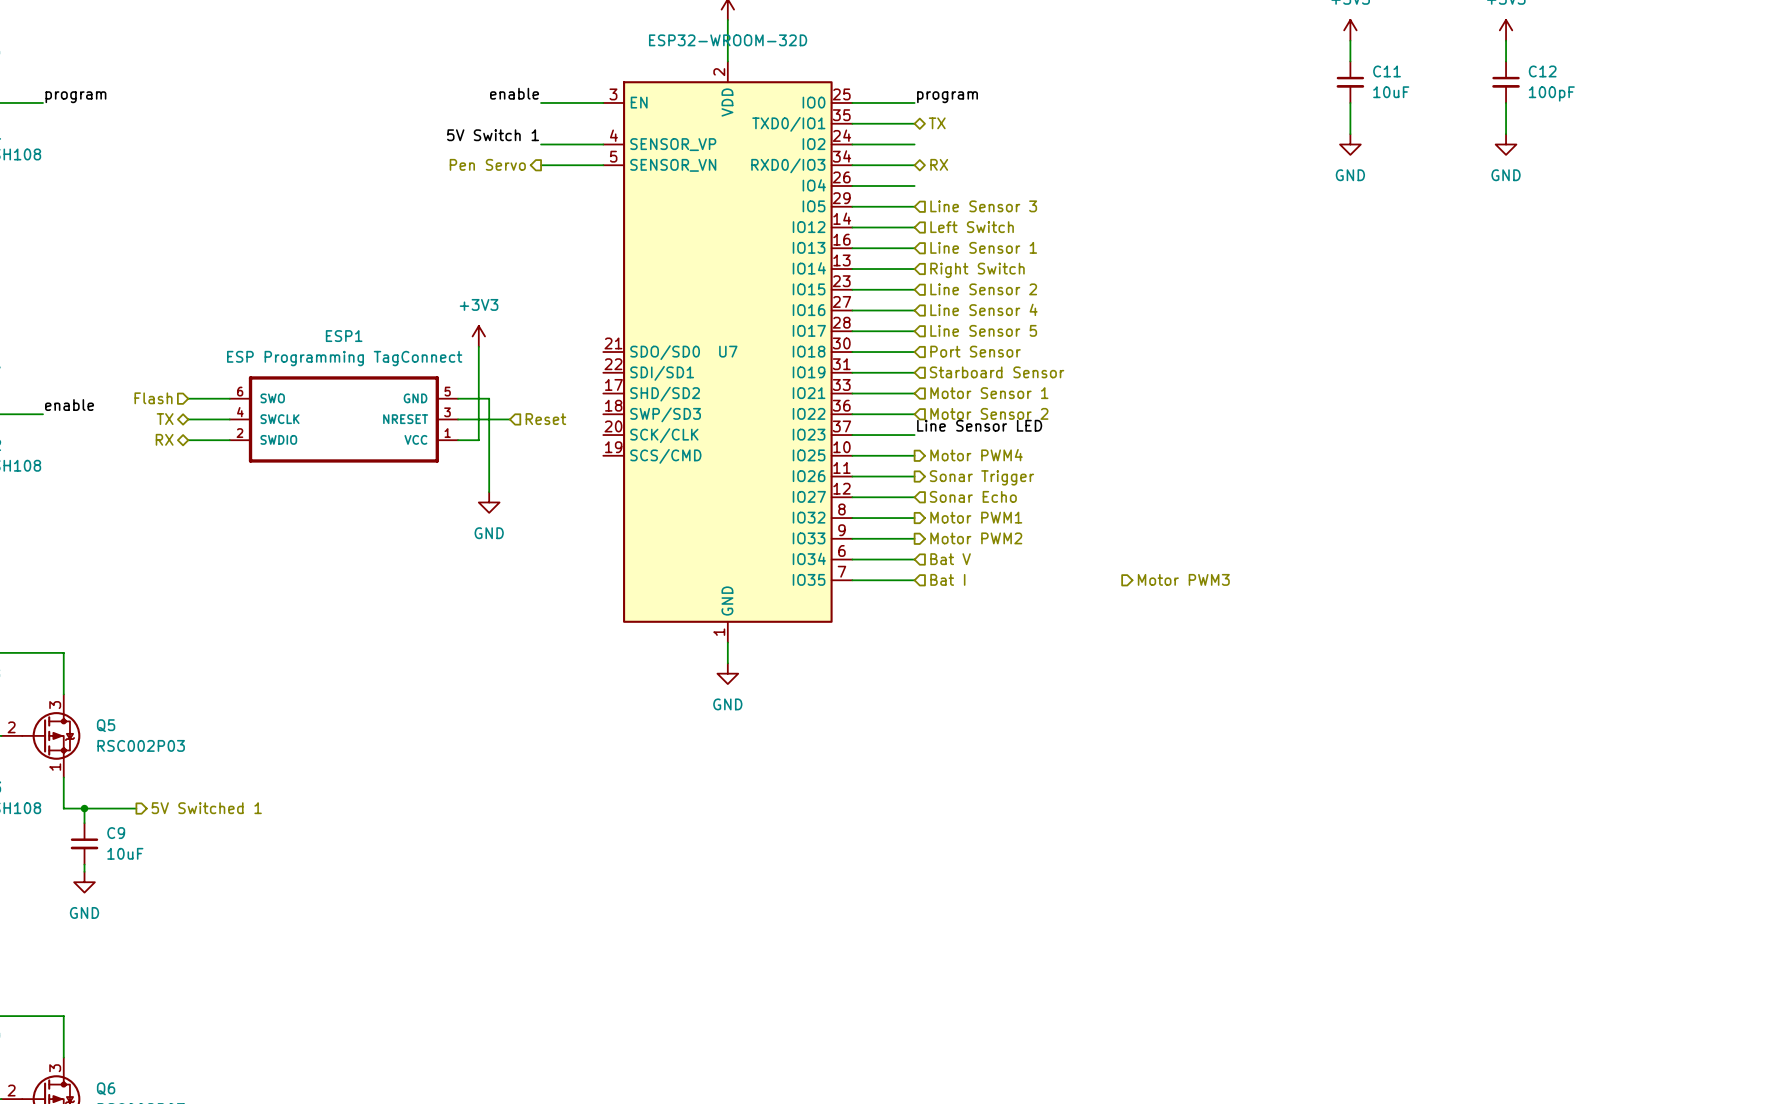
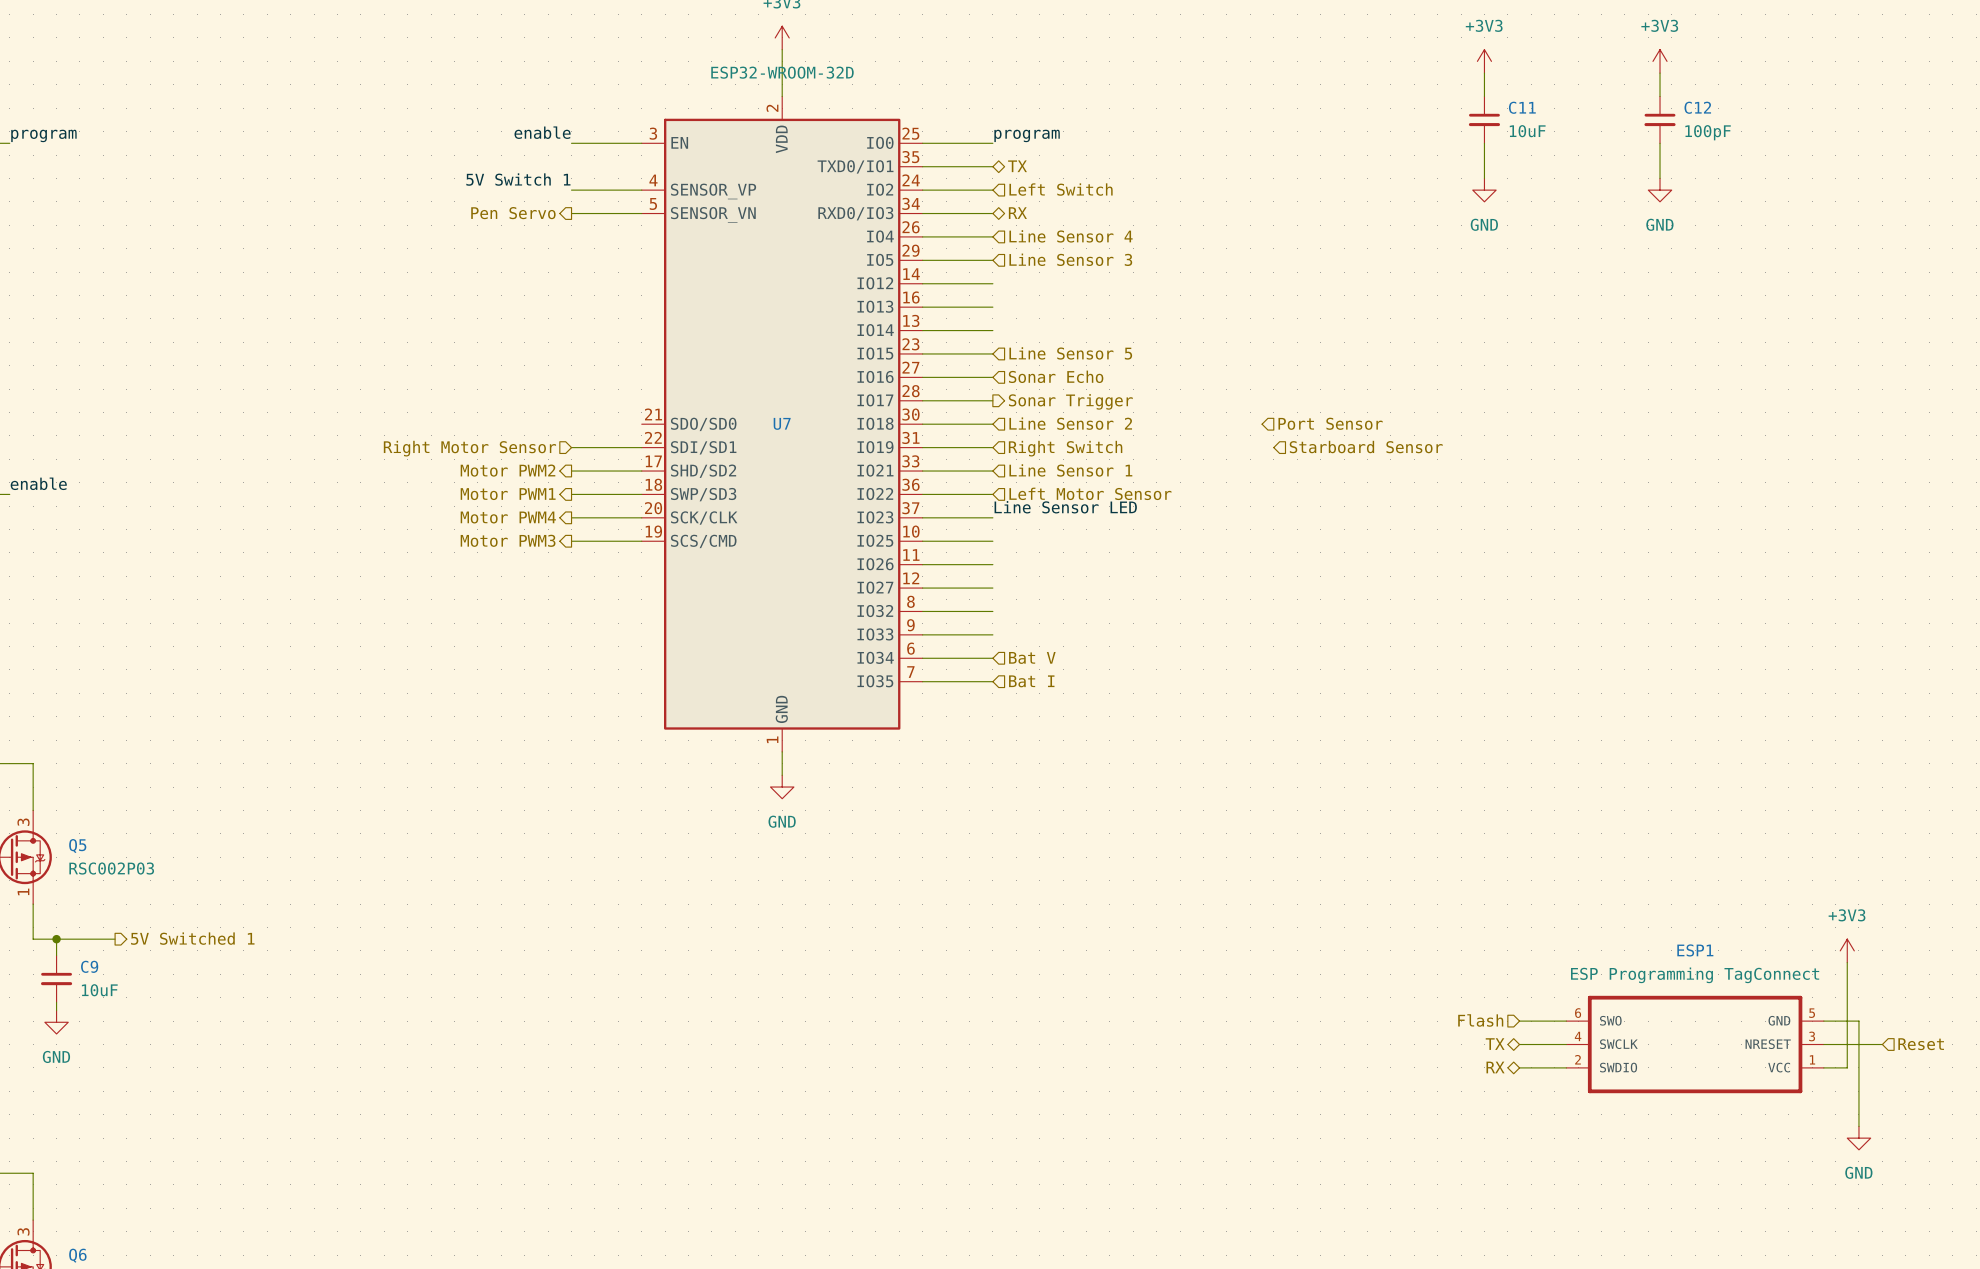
hierarchical label: none -> Line Sensor 4 (1071, 236)
hierarchical label position: Left Switch (972, 227) -> Left Switch (1061, 189)
hierarchical label: Line Sensor 1 (983, 247) -> none
hierarchical label: Right Switch (977, 270) -> none
hierarchical label: Line Sensor 2 (983, 289) -> Line Sensor 5 (1070, 353)
hierarchical label: Line Sensor 4 (983, 309) -> Sonar Echo (1056, 376)
hierarchical label shape: input (983, 330) -> output (1070, 401)
hierarchical label: Line Sensor 5 (983, 330) -> Sonar Trigger (1070, 401)
power symbol: +3V3 (478, 336) -> none
wire: (478, 346) (478, 440) (458, 440) -> none
hierarchical label: Port Sensor (975, 351) -> Line Sensor 2 (1070, 423)
hierarchical label: none -> Port Sensor (1330, 423)
wire: none -> (571, 447) (641, 447)
hierarchical label: Starboard Sensor (997, 372) -> Right Switch (1065, 448)
hierarchical label: none -> Starboard Sensor (1366, 447)
hierarchical label: none -> Right Motor Sensor (469, 448)
hierarchical label: none -> Motor PWM2 (508, 470)
wire: none -> (571, 471) (641, 471)
hierarchical label: Motor Sensor 1 (989, 393) -> Line Sensor 1 (1070, 470)
hierarchical label: Flash (153, 398) -> none
wire: (188, 398) (229, 398) -> none
wire: (458, 398) (489, 398) (489, 492) -> none
hierarchical label: Motor Sensor 2 (989, 413) -> Left Motor Sensor (1090, 493)
wire: none -> (571, 494) (641, 494)
hierarchical label: TX (165, 419) -> none
wire: (188, 419) (229, 419) -> none
ESP1 position: (343, 419) -> (1695, 1044)
wire: (458, 419) (509, 419) -> none
hierarchical label shape: input (545, 419) -> output (508, 494)
hierarchical label: Reset (545, 419) -> Motor PWM1 (508, 494)
hierarchical label: none -> Motor PWM4 (508, 517)
wire: none -> (571, 517) (641, 517)
hierarchical label: RX (164, 439) -> none
wire: (188, 440) (229, 440) -> none
hierarchical label: none -> Motor PWM3 (508, 540)
wire: none -> (571, 541) (641, 541)
hierarchical label: Motor PWM4 (976, 455) -> none
hierarchical label: Sonar Trigger (981, 477) -> none
hierarchical label: Sonar Echo (973, 496) -> none
power symbol: GND (489, 502) -> none
hierarchical label: Motor PWM1 (976, 517) -> none
hierarchical label: Motor PWM2 (976, 538) -> none
hierarchical label: Motor PWM3 (1183, 579) -> none
power symbol: none -> +3V3 (1847, 950)
wire: none -> (1847, 962) (1847, 1067) (1823, 1067)
hierarchical label: none -> Flash (1480, 1020)
wire: none -> (1519, 1021) (1566, 1021)
wire: none -> (1823, 1021) (1858, 1021) (1858, 1126)
hierarchical label: none -> TX (1495, 1044)
wire: none -> (1519, 1044) (1566, 1044)
wire: none -> (1823, 1044) (1882, 1044)
hierarchical label: none -> Reset (1921, 1044)
hierarchical label: none -> RX (1495, 1067)
wire: none -> (1519, 1067) (1566, 1067)
power symbol: none -> GND (1858, 1138)

